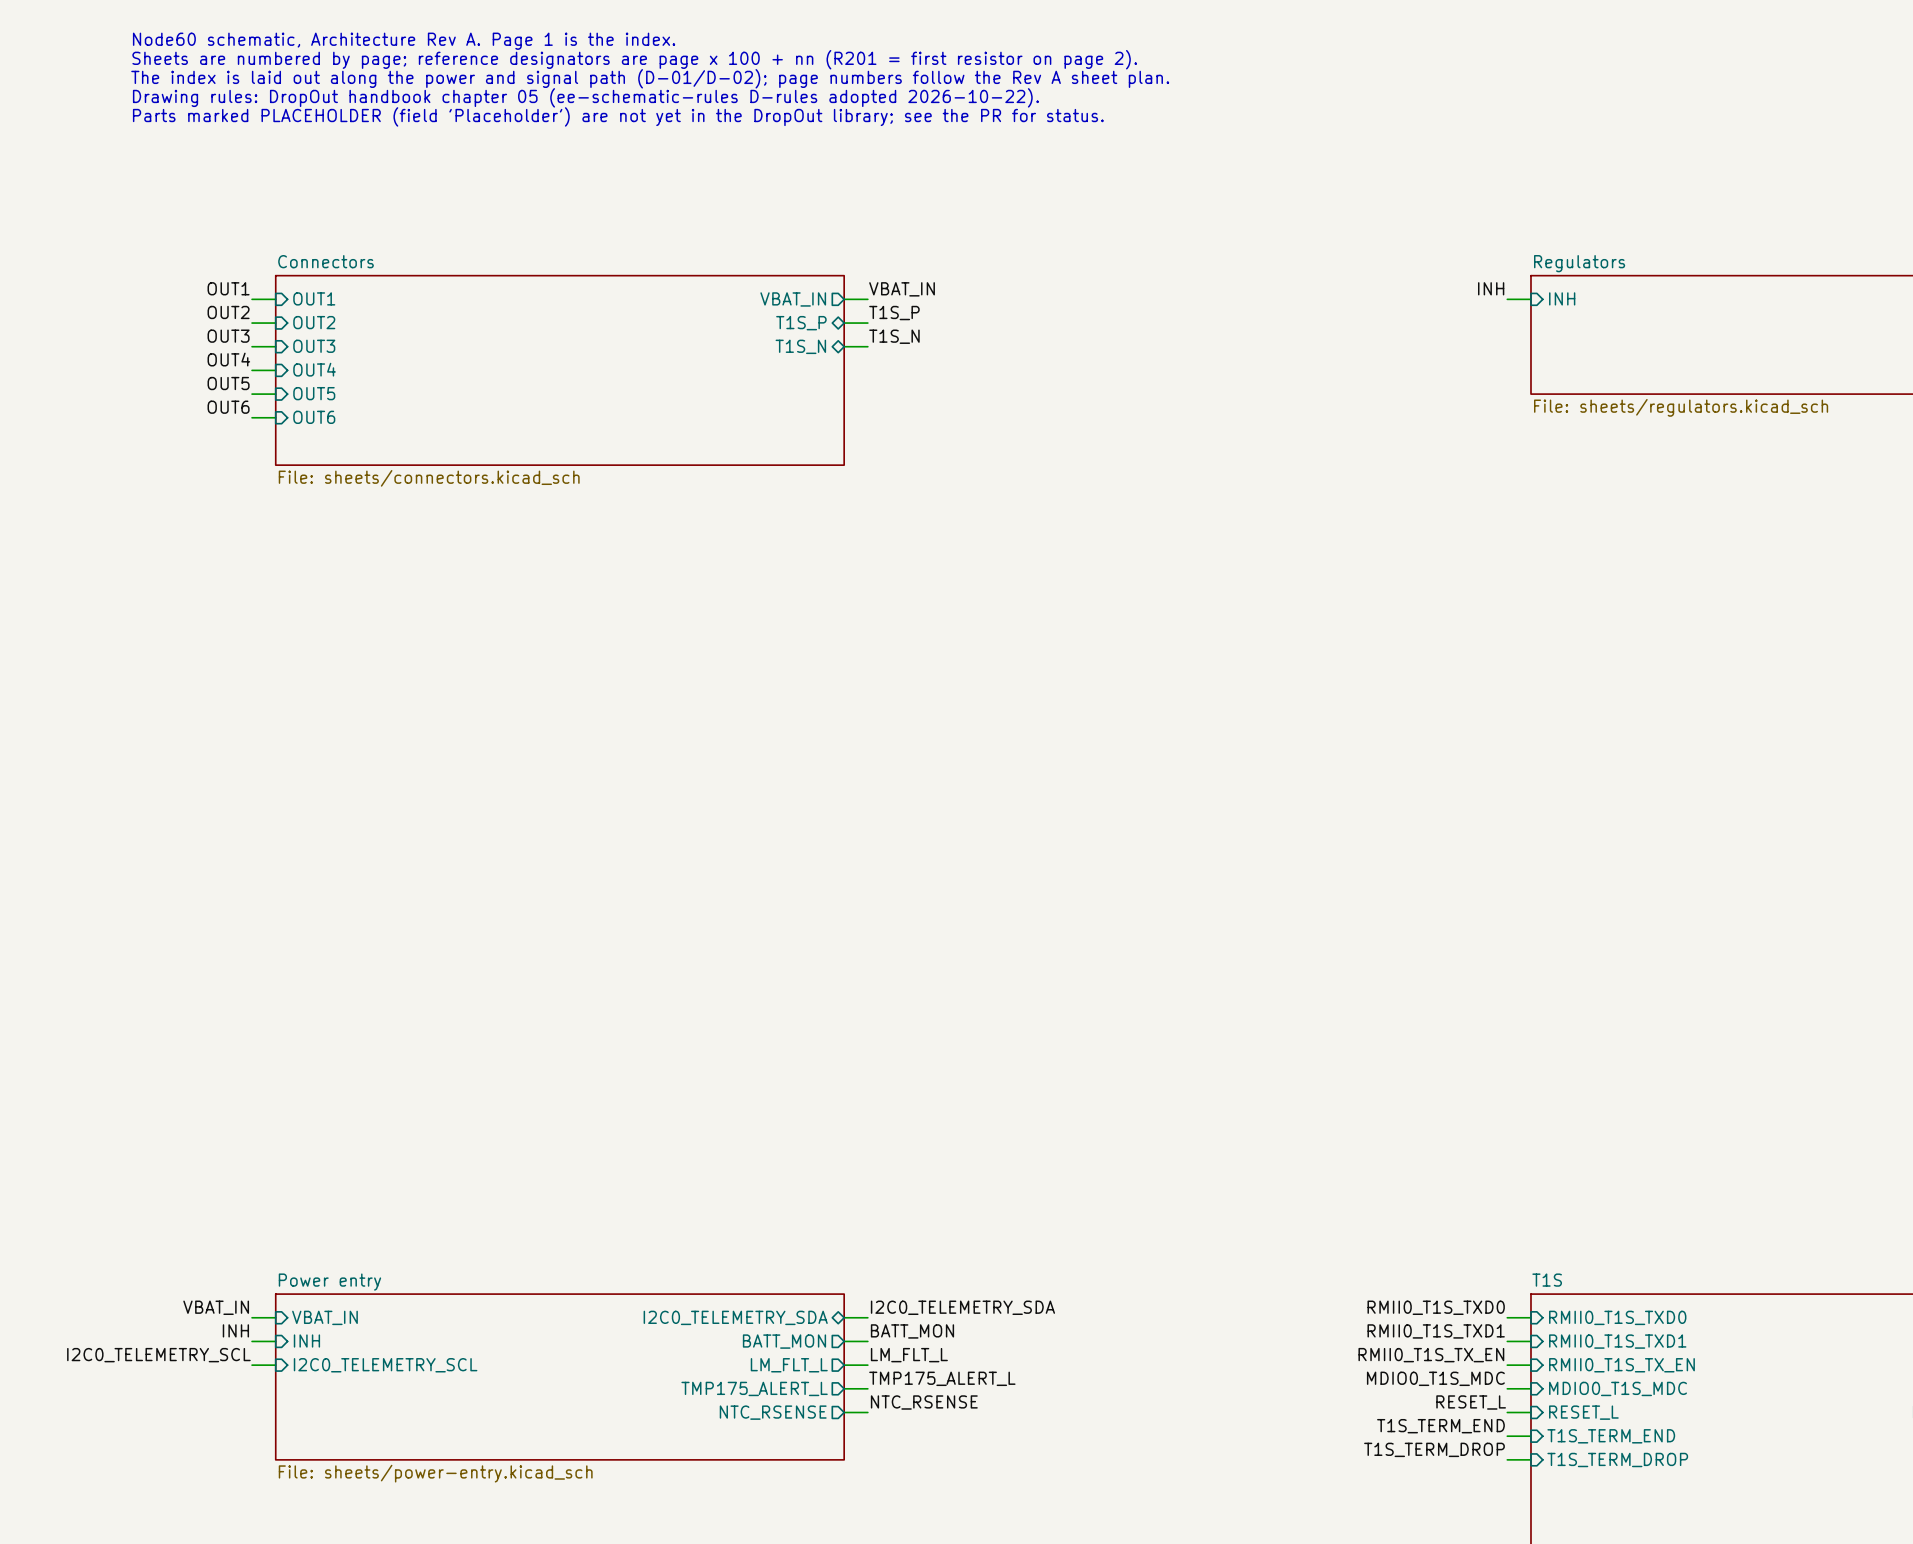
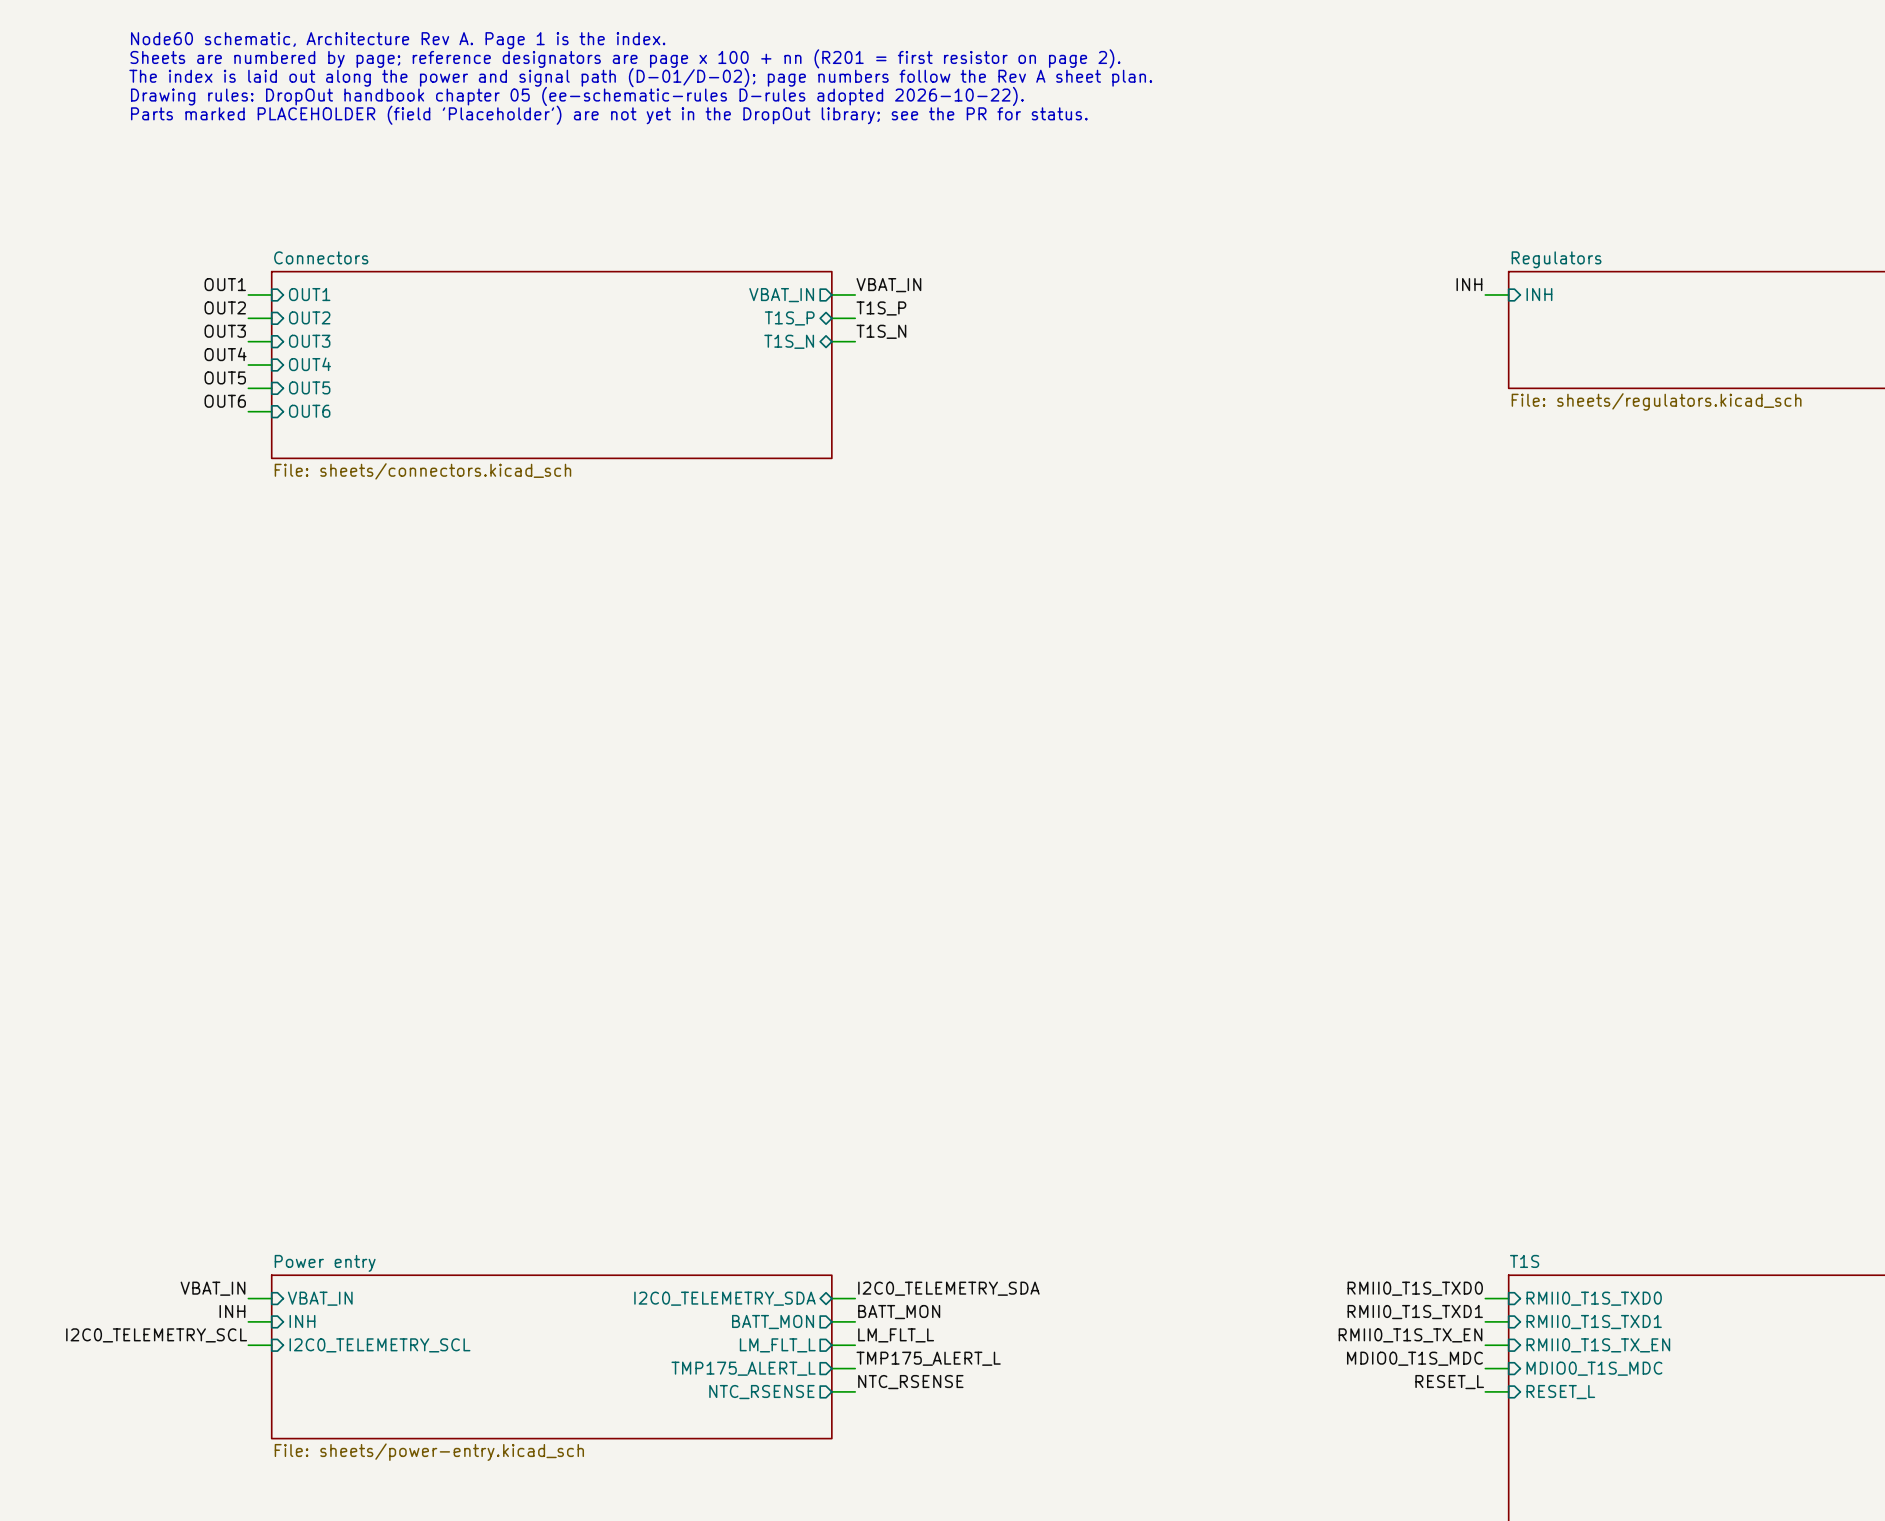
label: T1S_TERM_END (1440, 1426) -> none
wire: (1507, 1436) (1530, 1436) -> none
sheet pin: T1S_TERM_END (1611, 1436) -> none
label: T1S_TERM_DROP (1434, 1449) -> none
wire: (1507, 1459) (1530, 1459) -> none
sheet pin: T1S_TERM_DROP (1617, 1459) -> none

